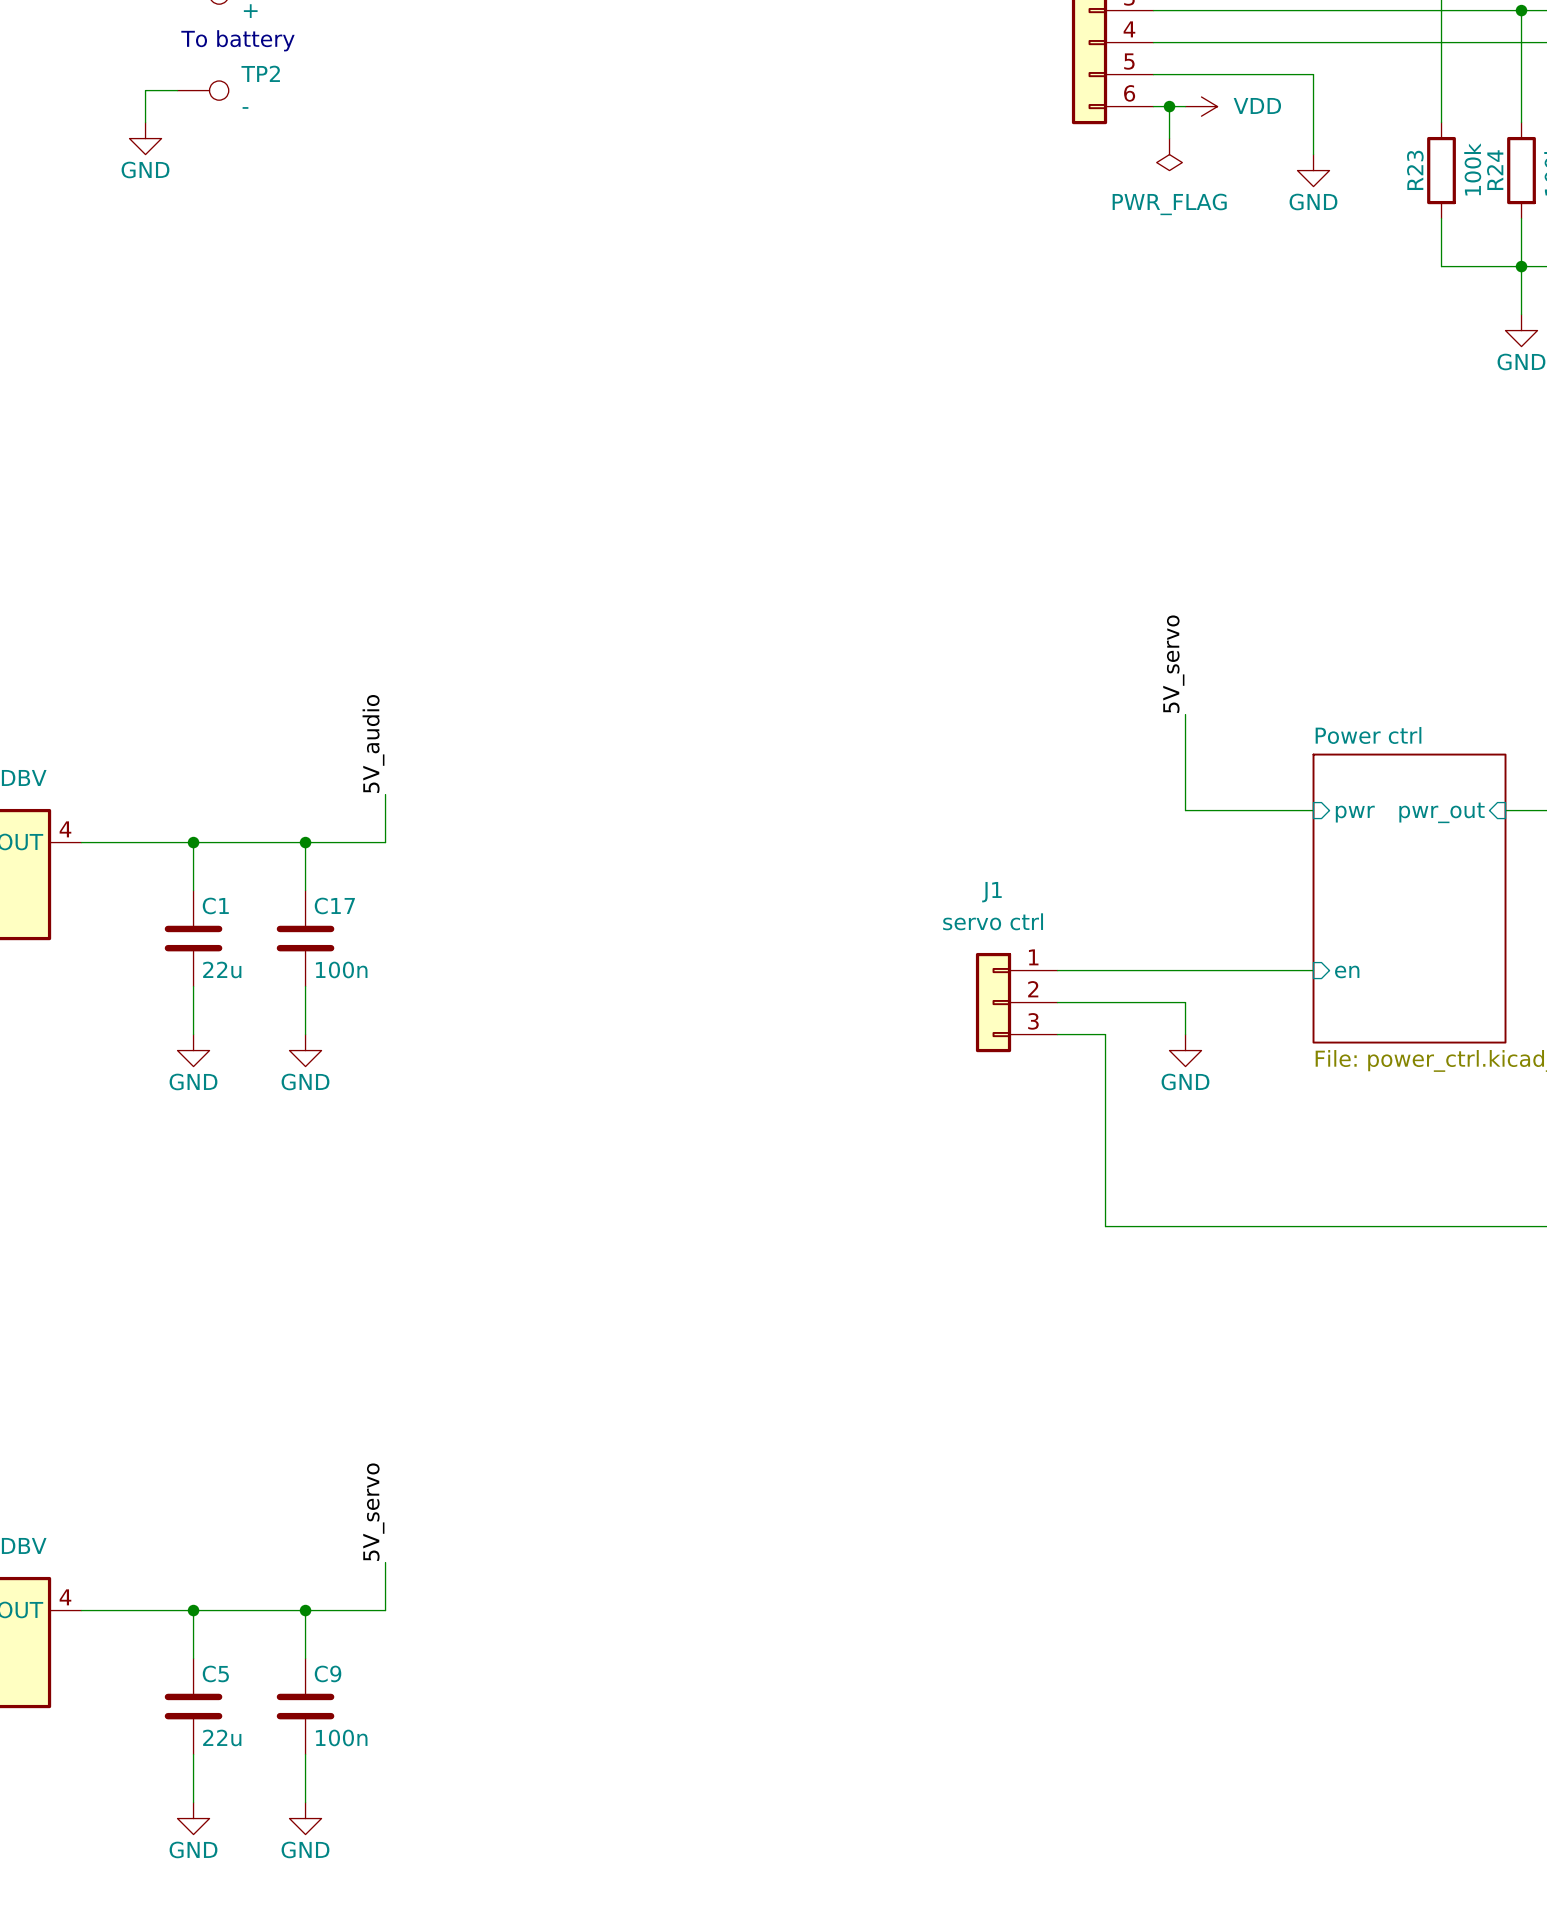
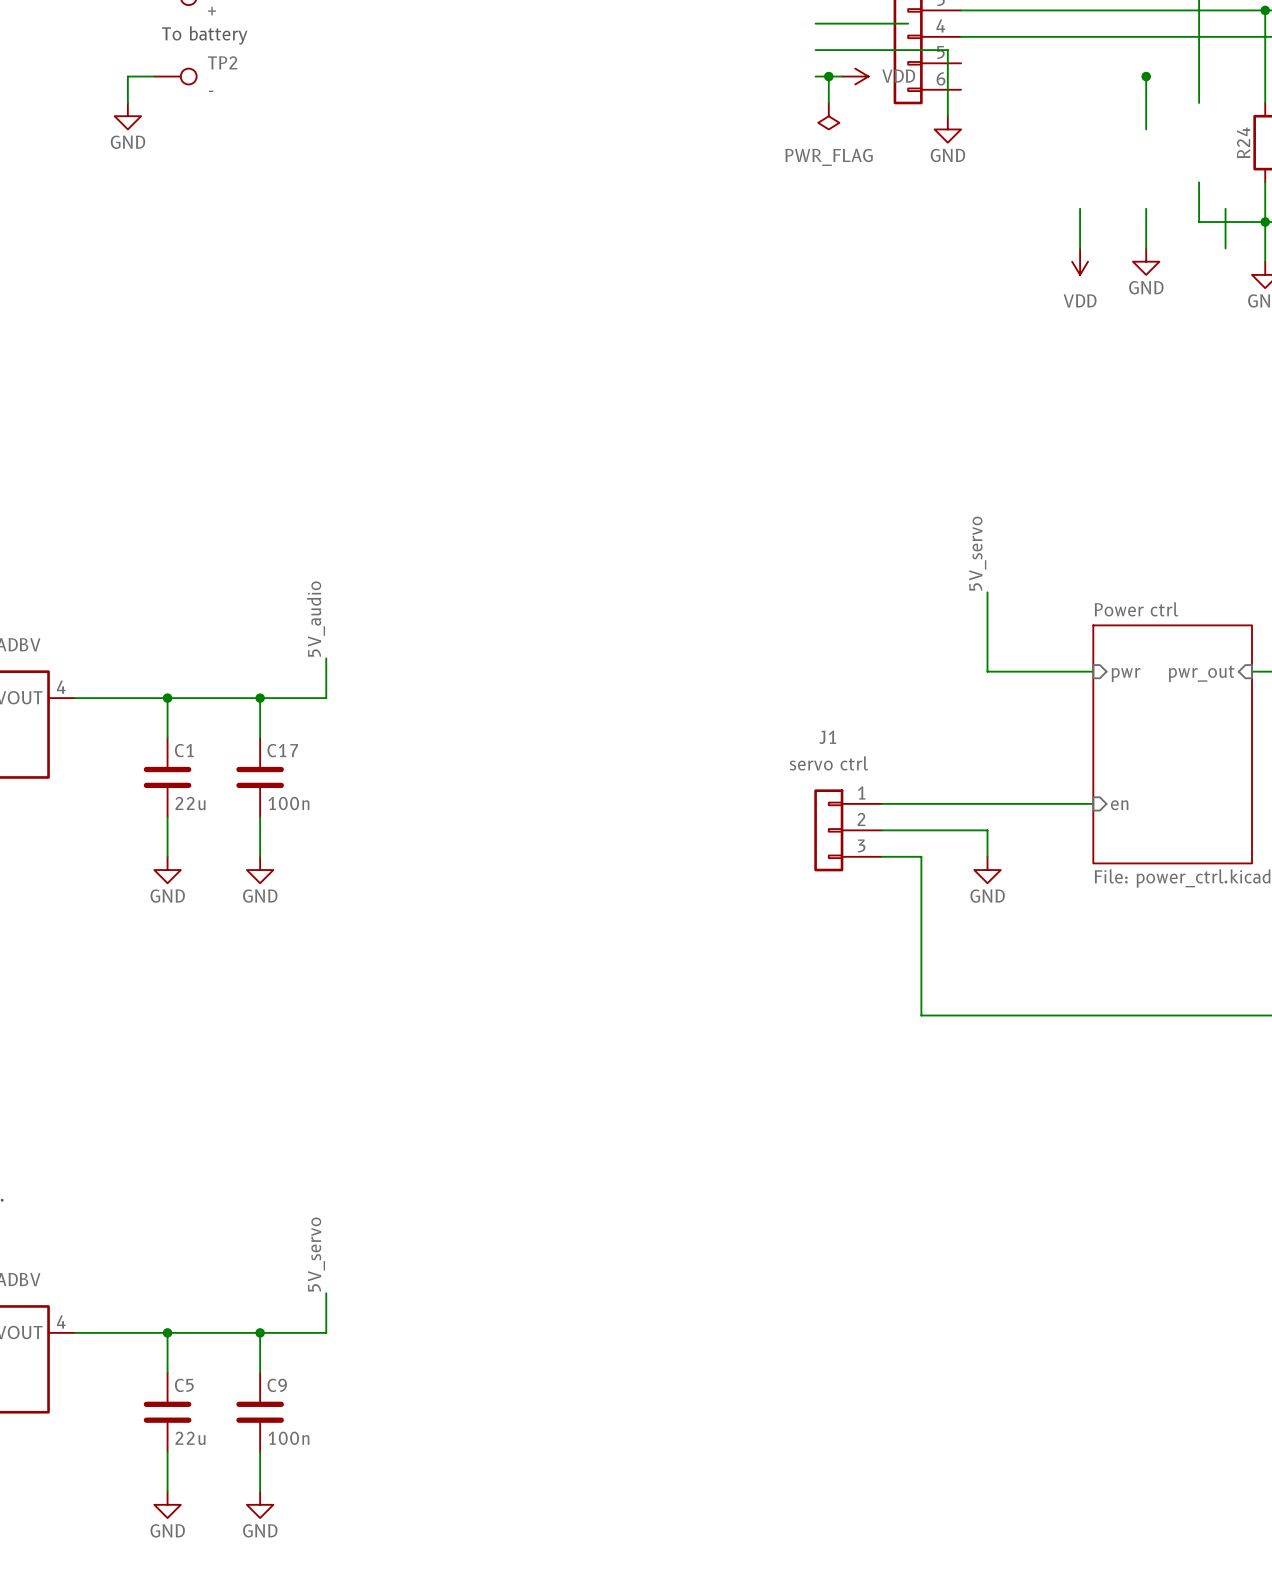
wire: none -> (815, 23) (908, 23)
wire: (1153, 74) (1313, 74) (1313, 154) -> (815, 50) (947, 50) (947, 116)
junction: none -> (828, 76)
power symbol: none -> VDD (855, 76)
wire: none -> (1146, 76) (1146, 129)
junction: none -> (1146, 76)
wire: (1153, 106) (1185, 106) -> (815, 76) (842, 76)
wire: (1169, 106) (1169, 138) -> (828, 76) (828, 102)
junction: (1169, 106) -> none
power symbol: VDD (1201, 106) -> none
power symbol: none -> GND (947, 129)
power symbol position: PWR_FLAG (1169, 154) -> PWR_FLAG (828, 116)
power symbol: GND (1313, 170) -> none
R23: 100k (1441, 170) -> none
wire: none -> (1080, 208) (1080, 248)
wire: none -> (1146, 208) (1146, 248)
wire: none -> (1225, 208) (1225, 248)
power symbol: none -> VDD (1080, 261)
power symbol: none -> GND (1146, 261)

